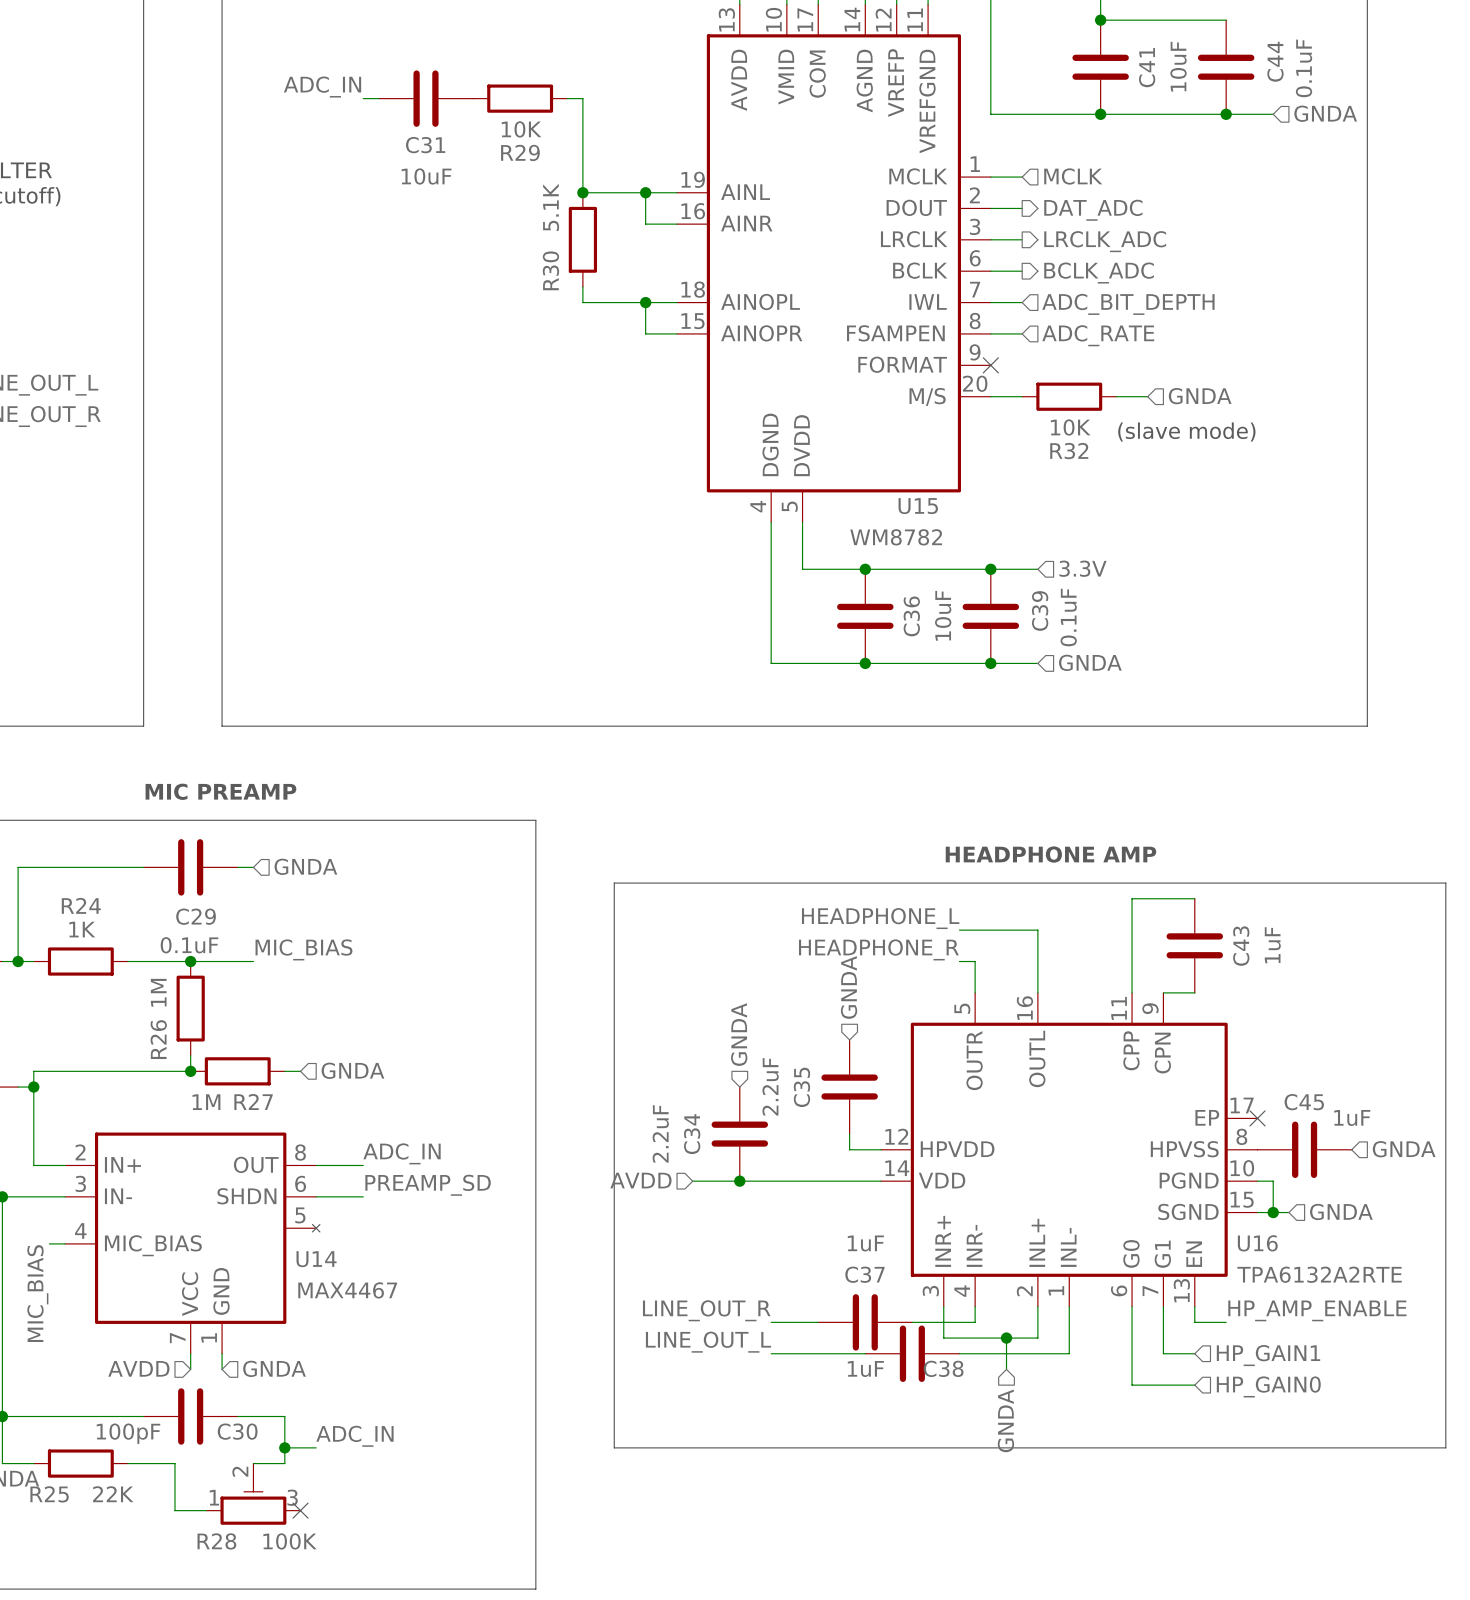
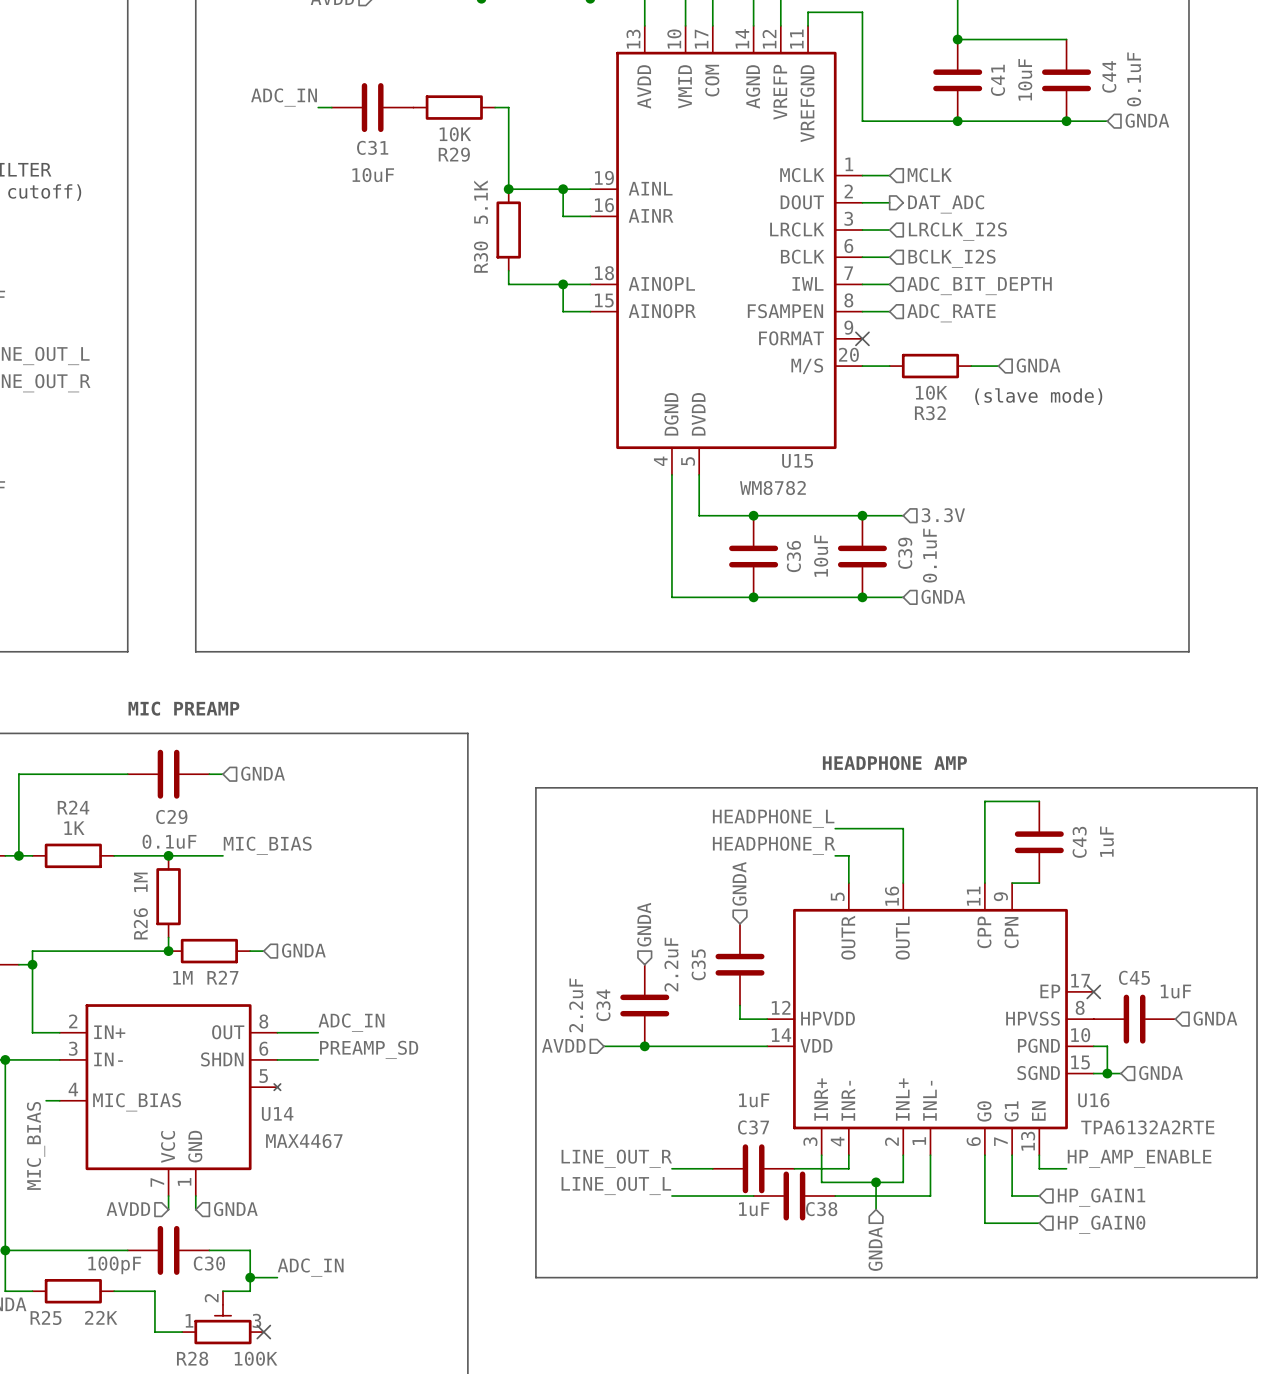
hierarchical label shape: output (1105, 241) -> input (957, 231)
hierarchical label: LRCLK_ADC (1105, 241) -> LRCLK_I2S (957, 231)
hierarchical label shape: output (1099, 273) -> input (952, 258)
hierarchical label: BCLK_ADC (1099, 273) -> BCLK_I2S (952, 258)

